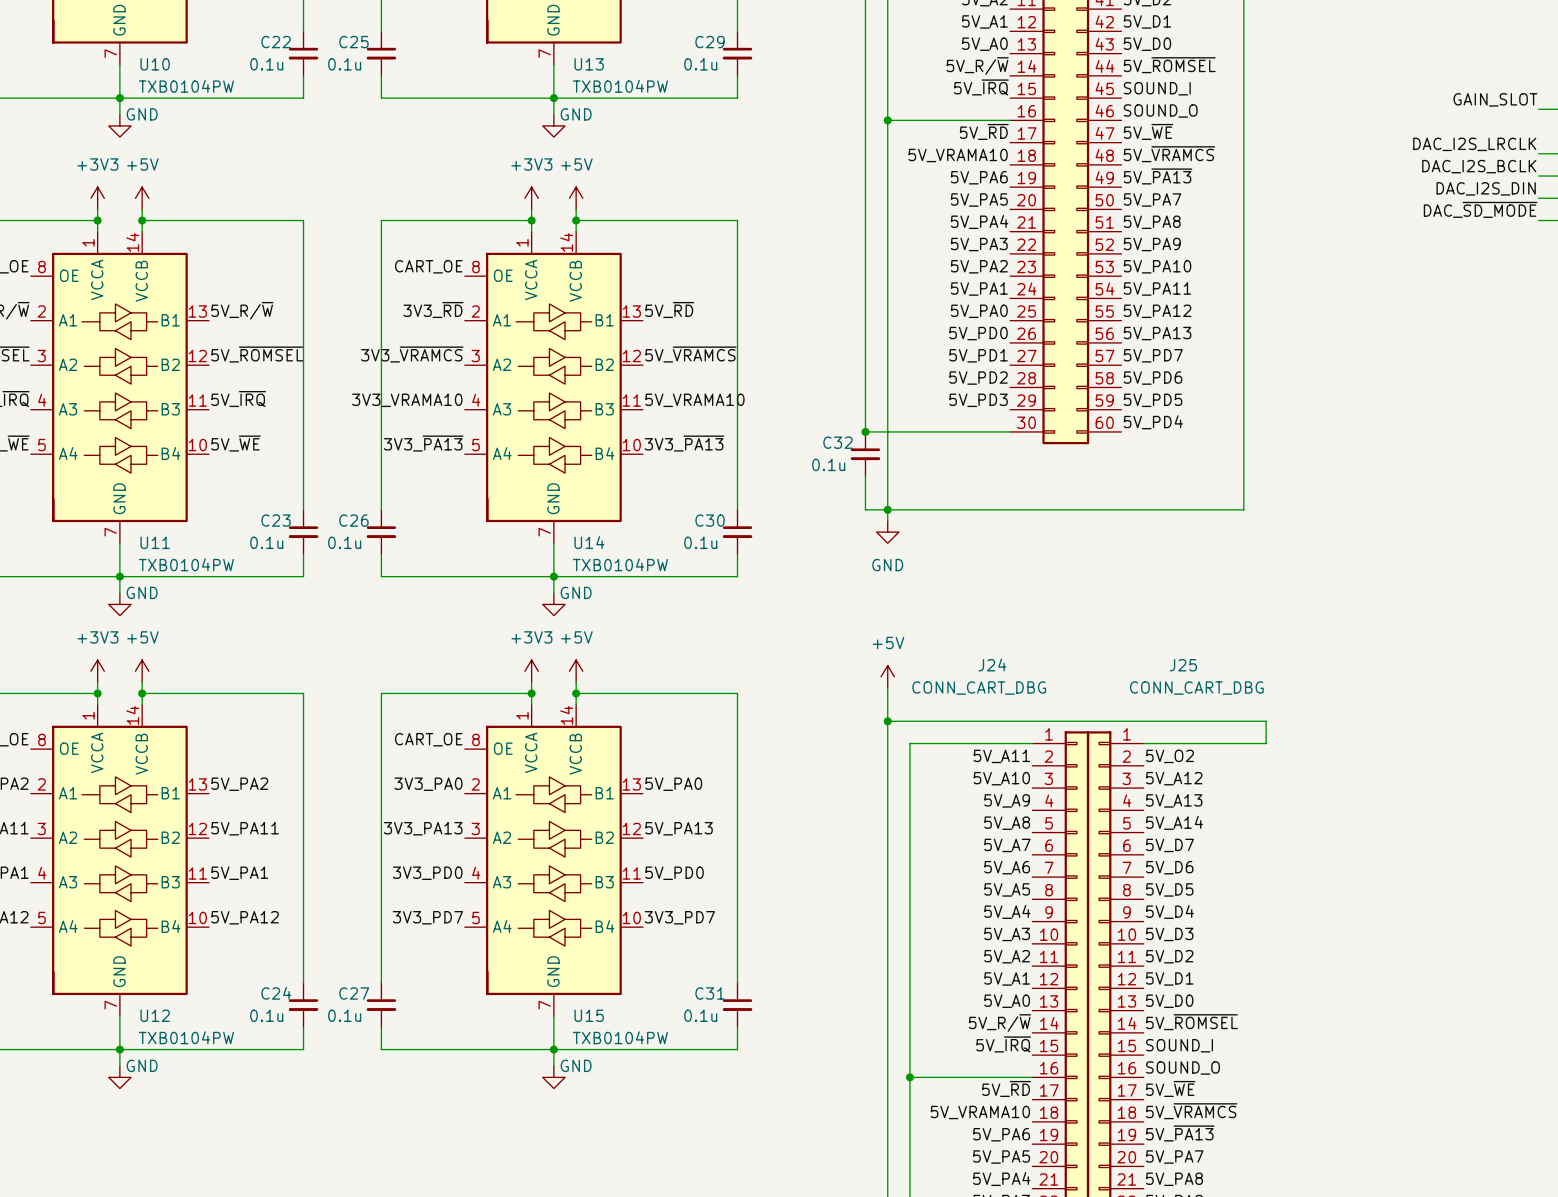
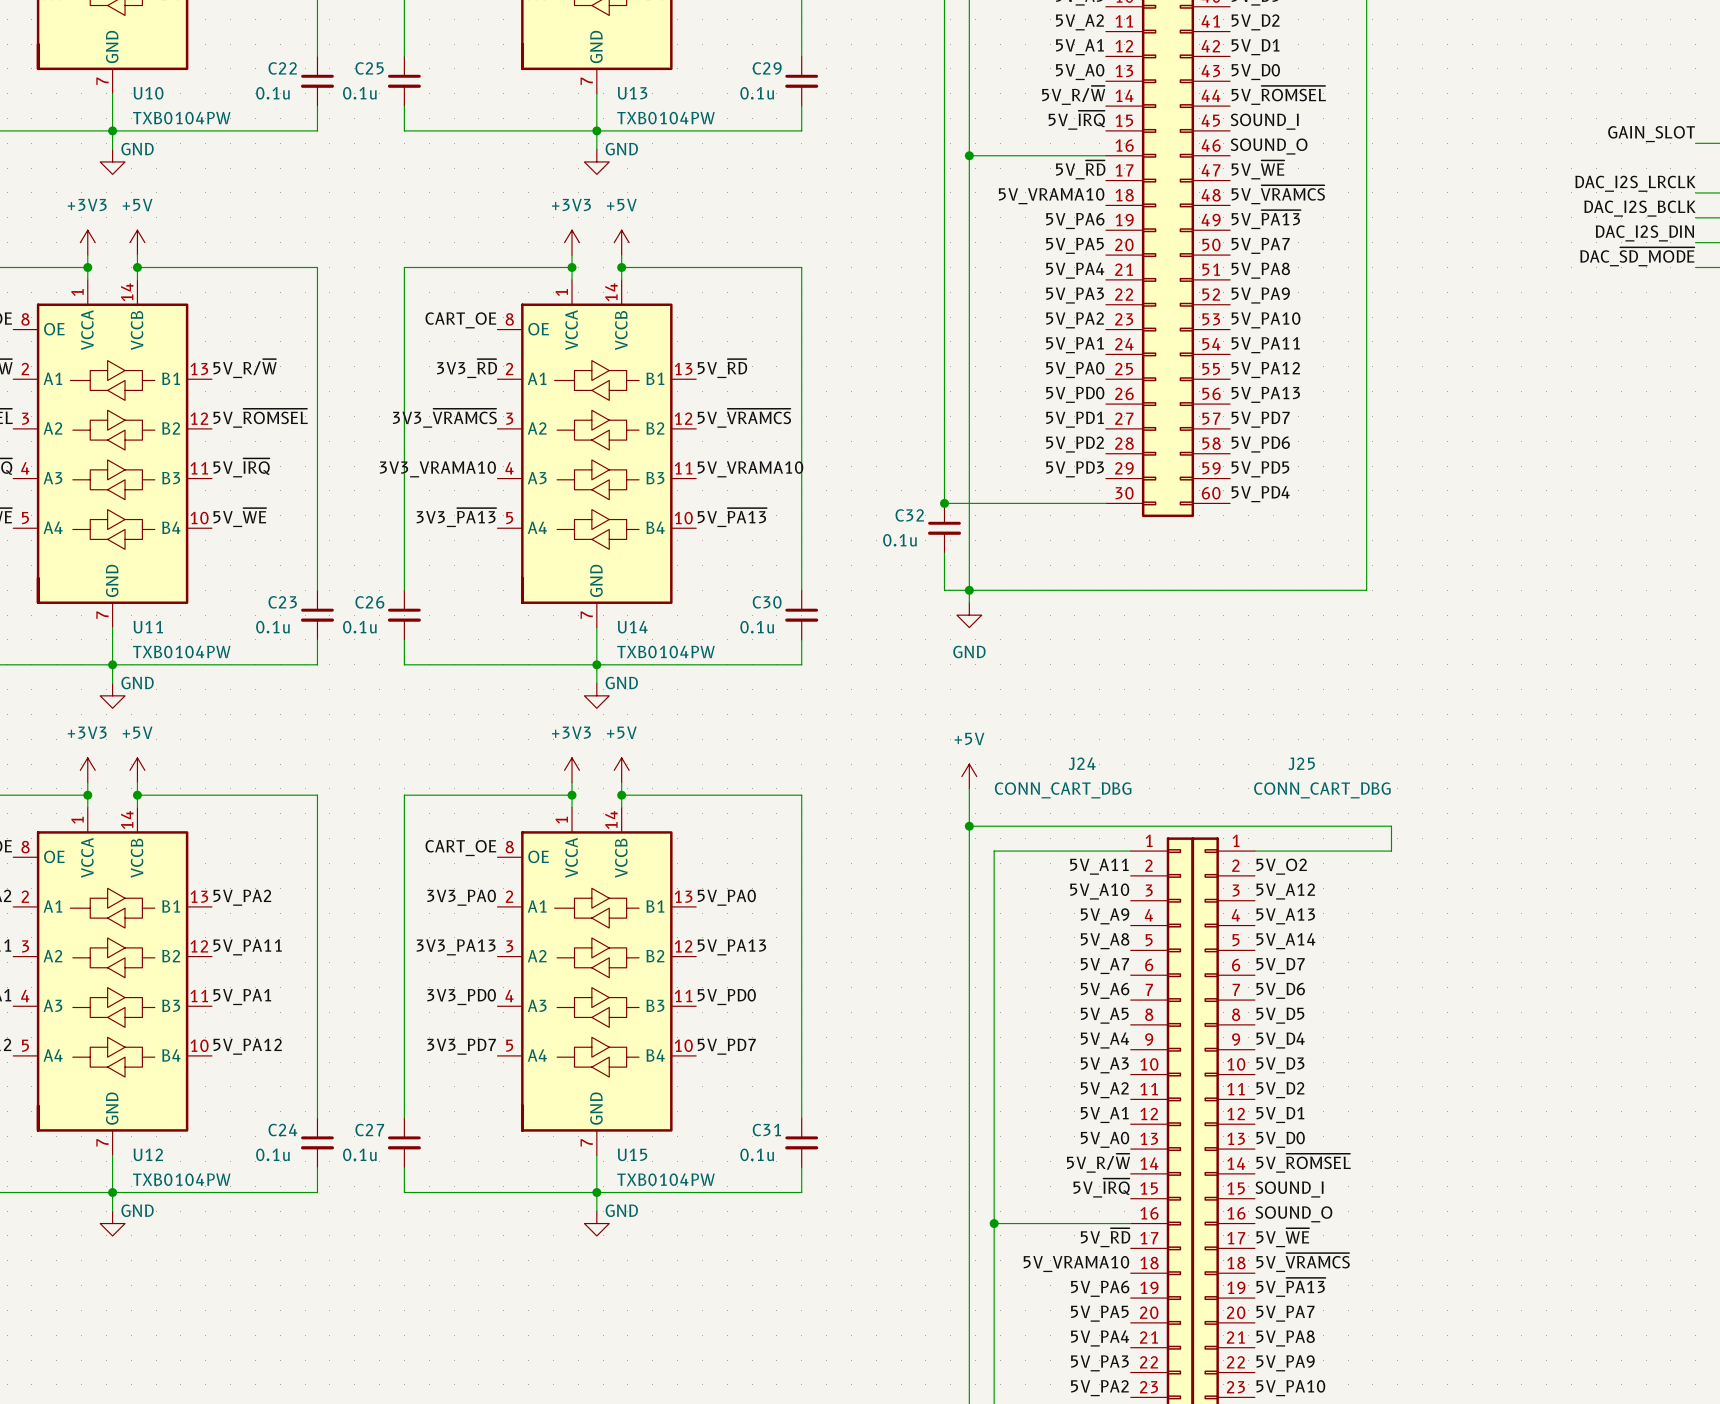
label: 3V3_~{PA13} (684, 443) -> 5V_~{PA13} (732, 517)
label: 3V3_PD7 (679, 917) -> 5V_PD7 (726, 1046)

